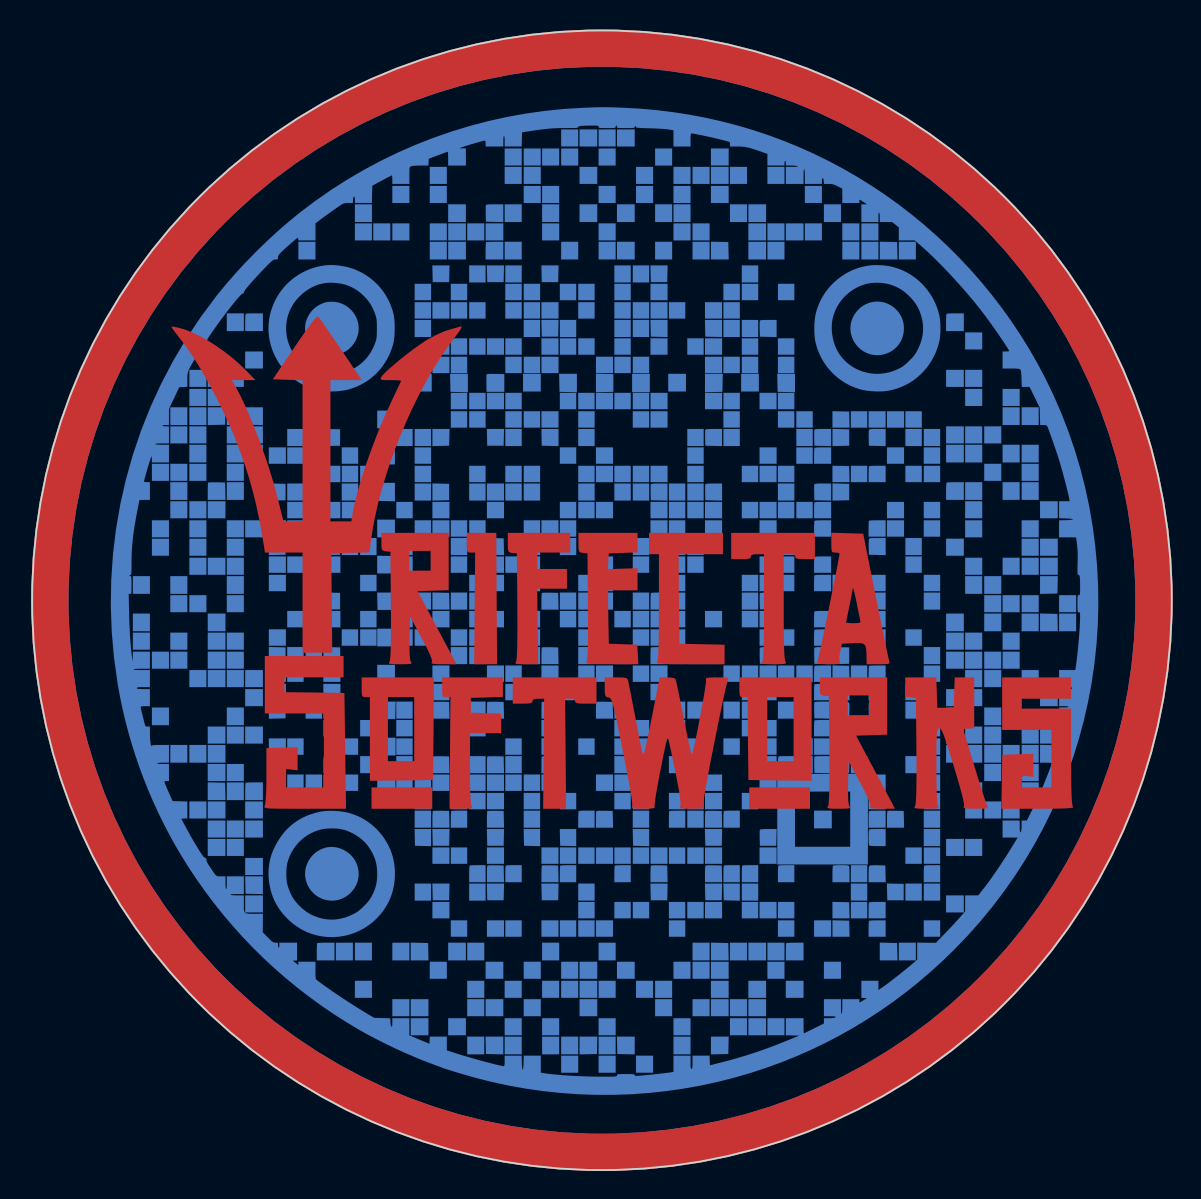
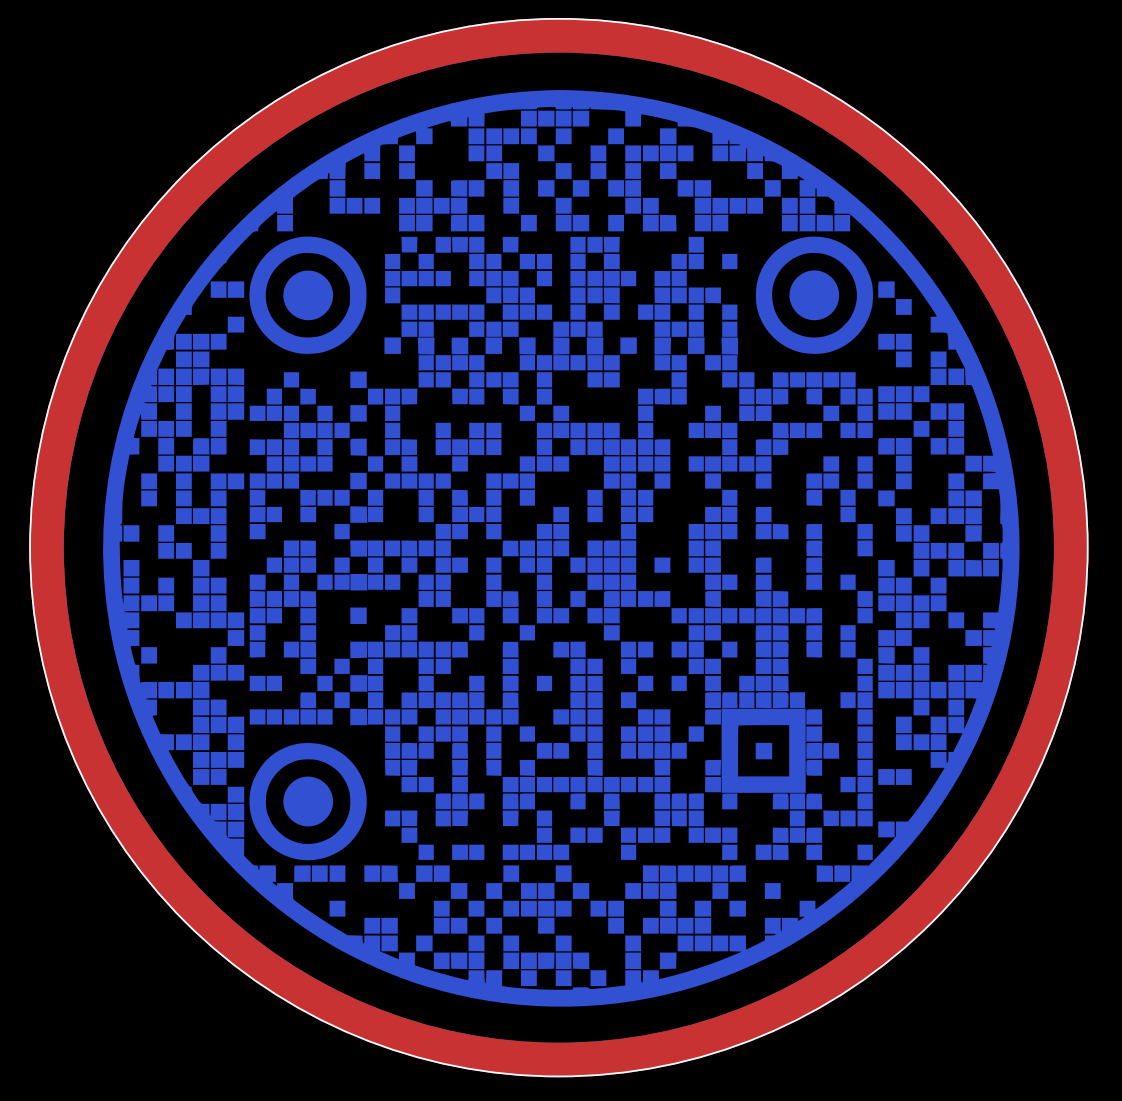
drawing: [171, 316, 1074, 809] -> none

